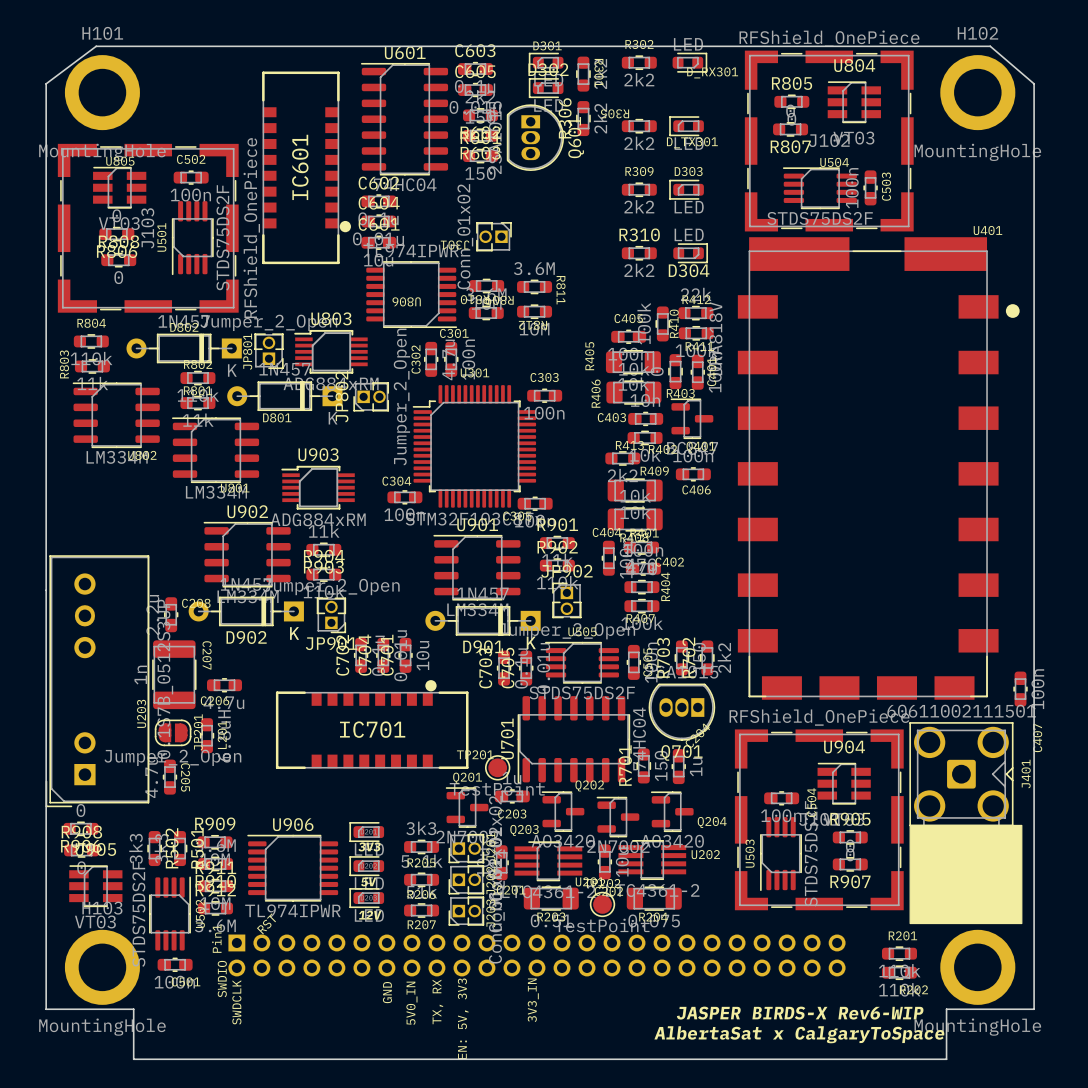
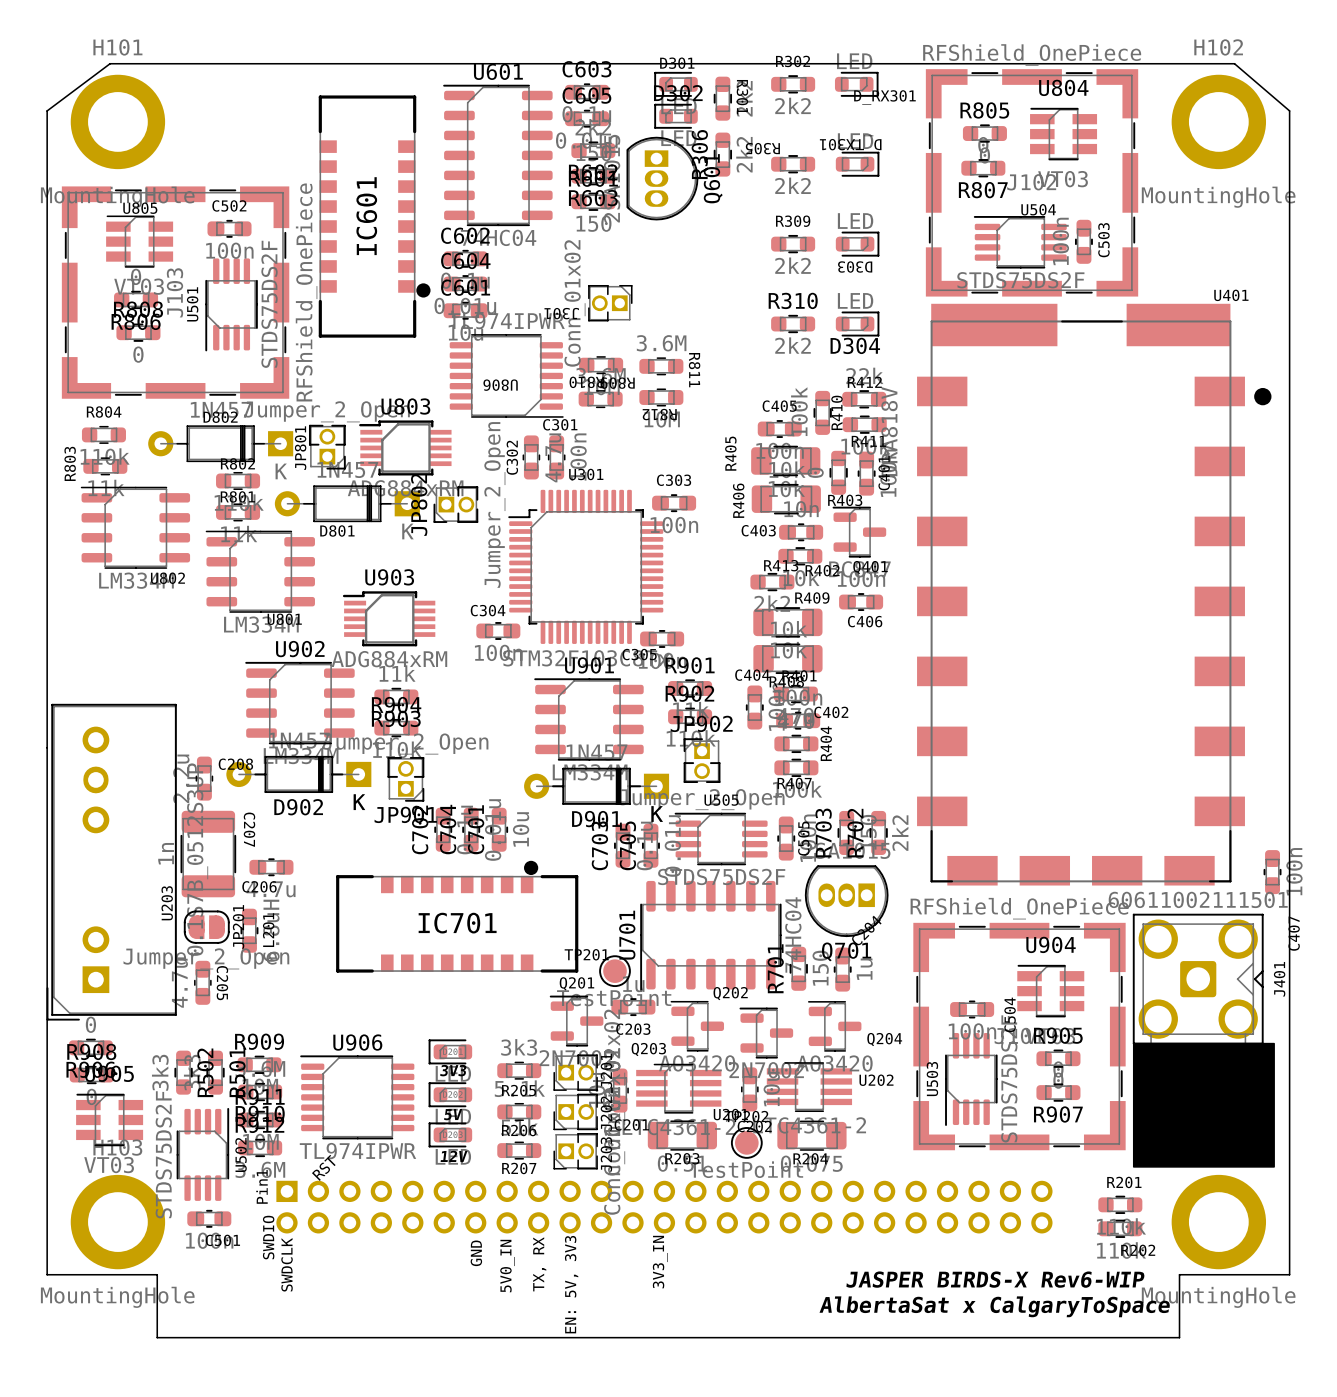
D_TX301 rotation: 0° (686, 126) -> 180° (857, 164)
D303 rotation: 0° (686, 189) -> 180° (857, 244)

